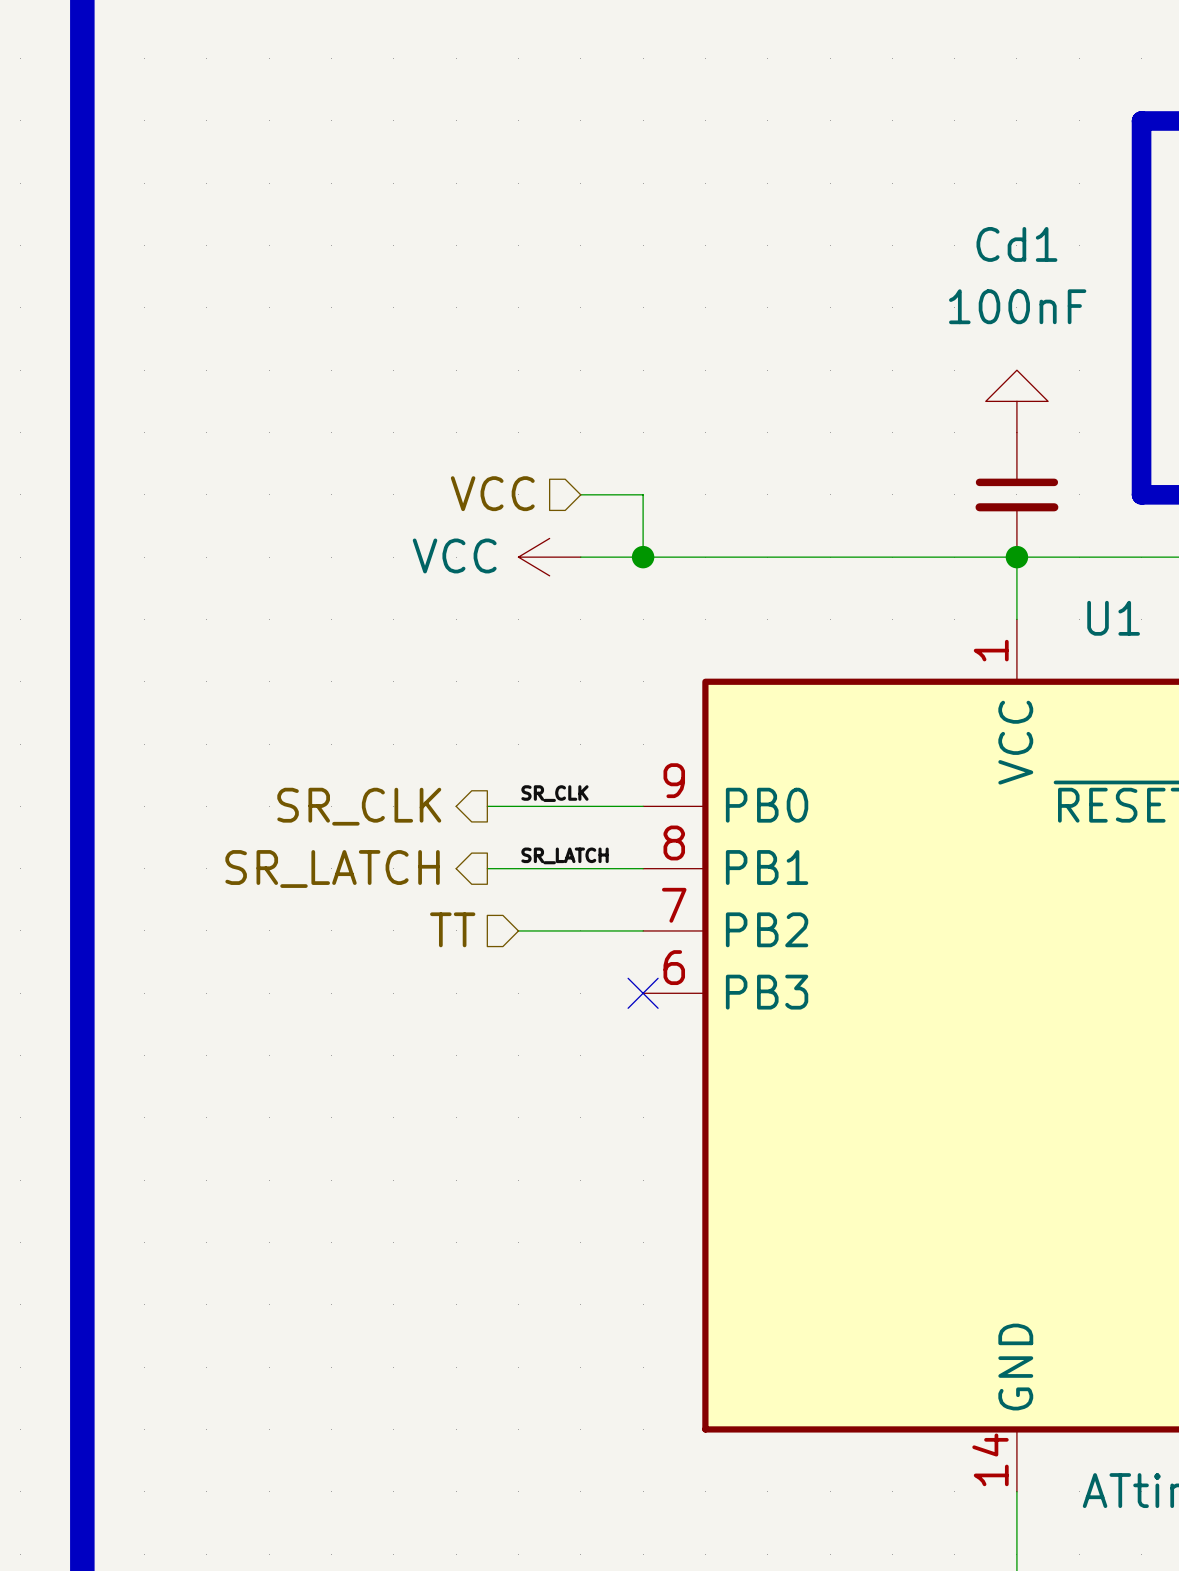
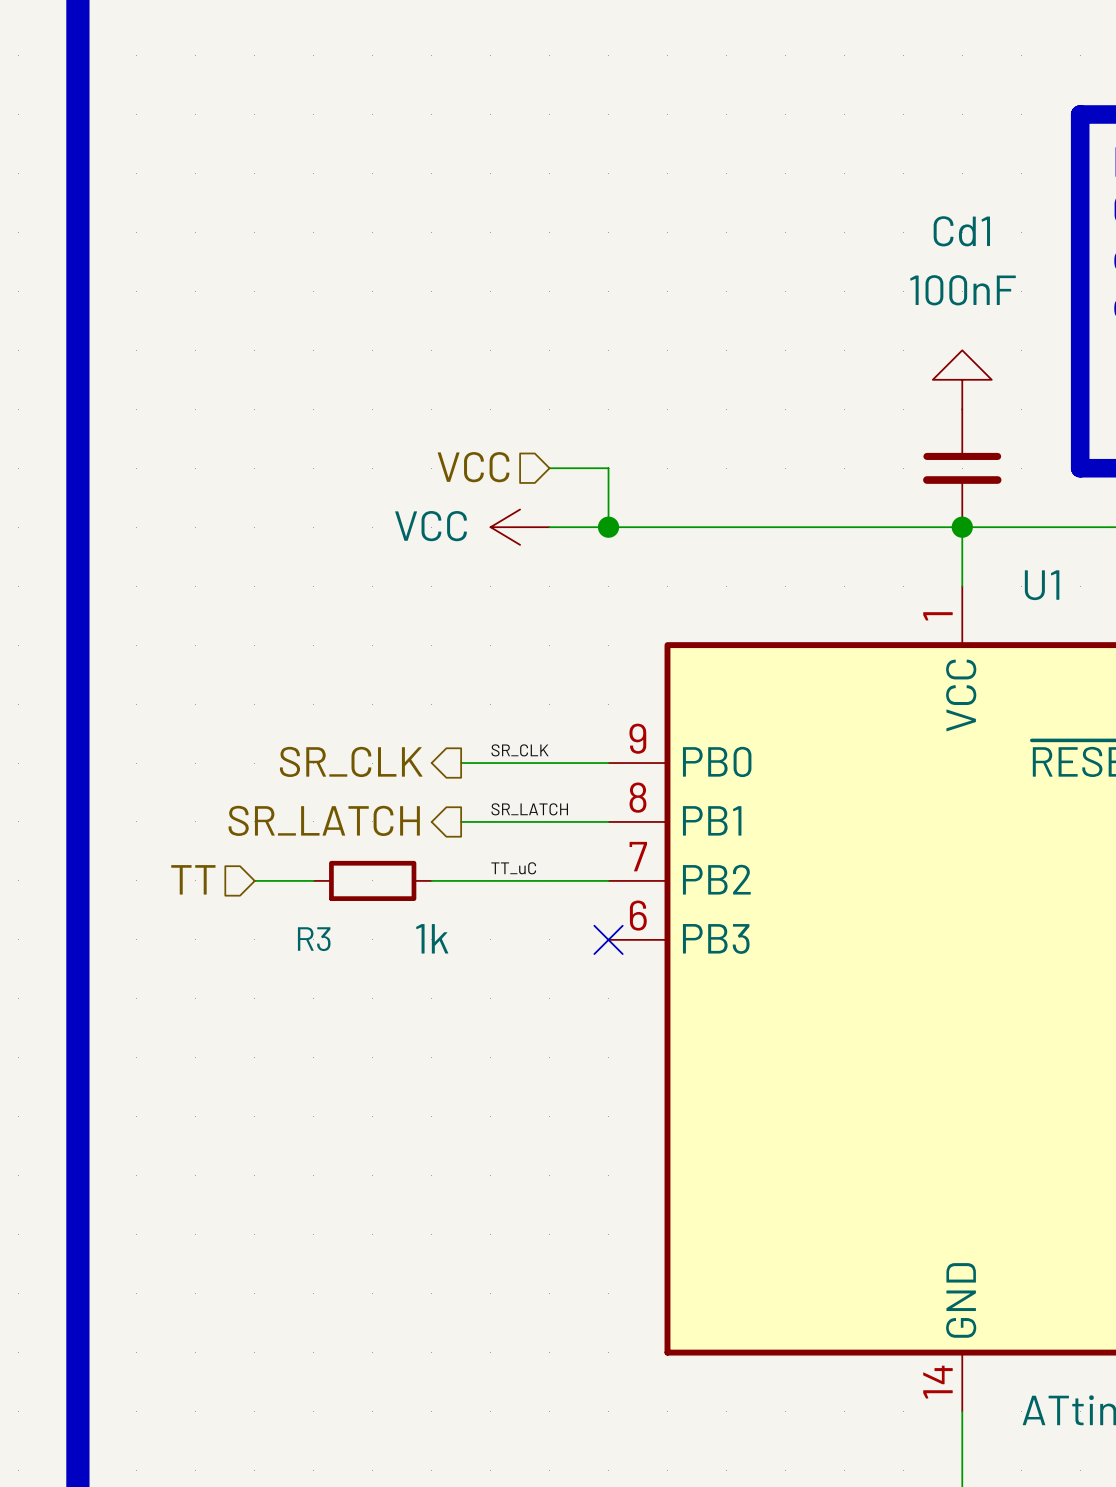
label: none -> TT_uC (513, 868)
hierarchical label position: TT (452, 929) -> TT (193, 879)
wire: none -> (254, 880) (313, 880)
R3: none -> 1k (372, 880)
wire: none -> (431, 880) (490, 880)

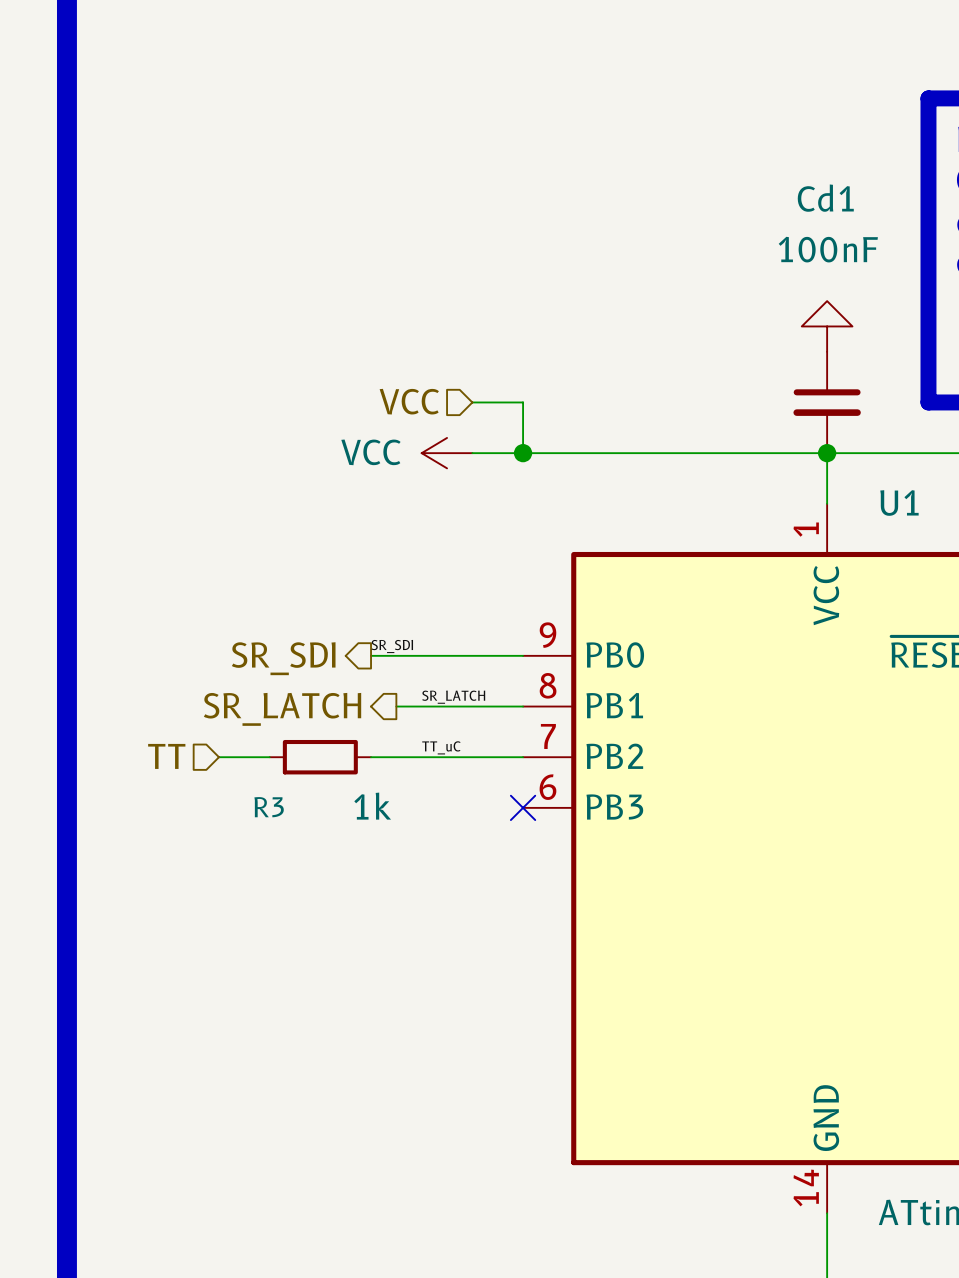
label: none -> SR_SDI (392, 646)
label: SR_CLK (520, 750) -> none
hierarchical label: none -> SR_SDI (283, 658)
hierarchical label: SR_CLK (351, 761) -> none
wire: none -> (371, 655) (396, 655)

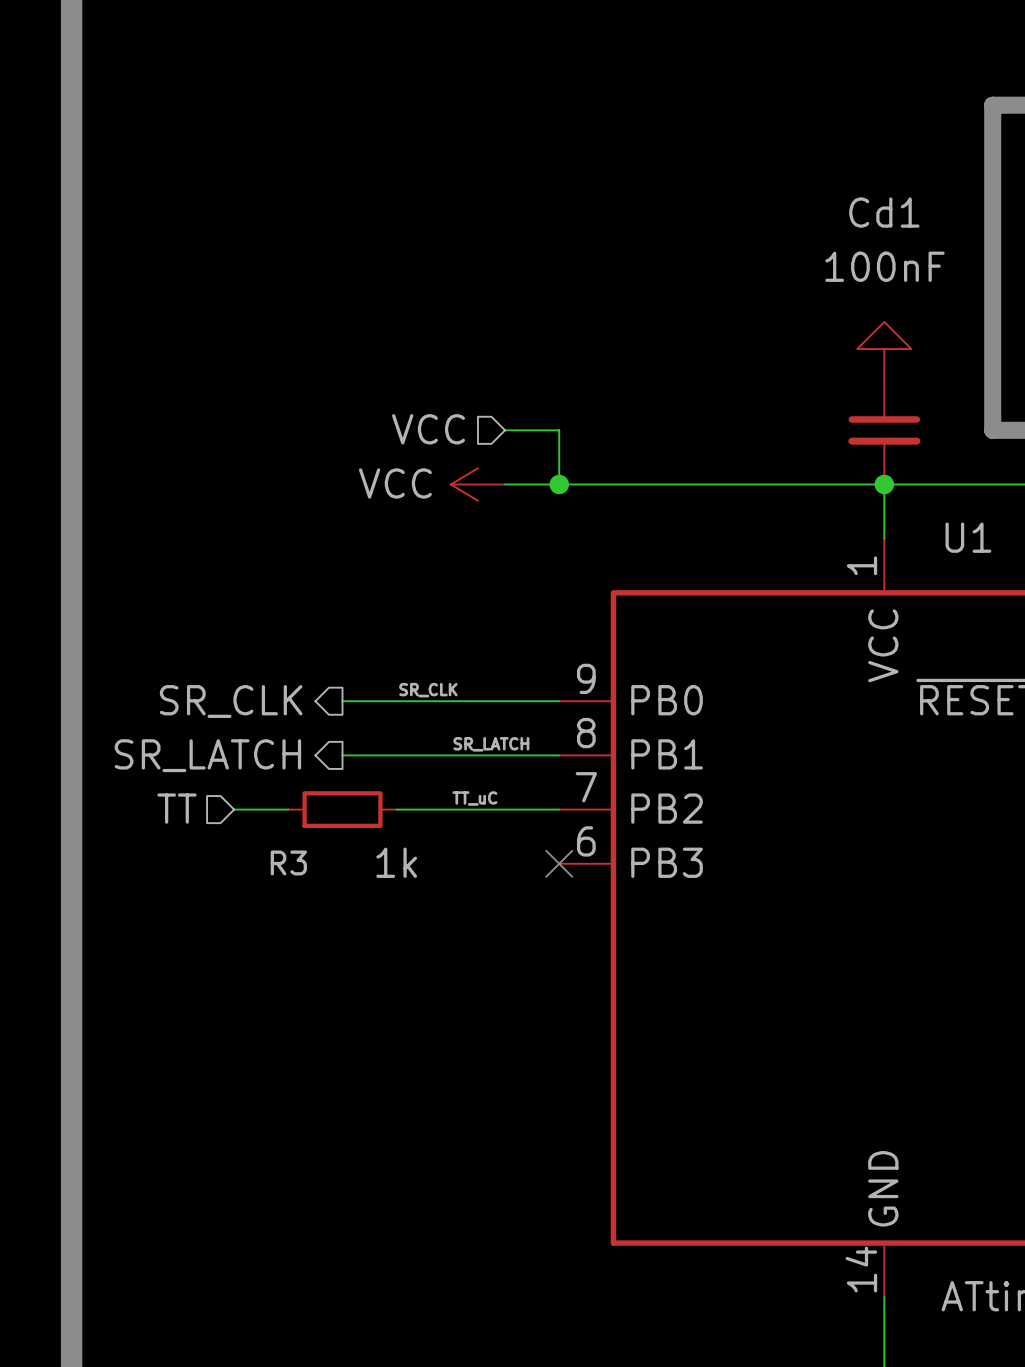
label: SR_SDI (392, 646) -> SR_CLK (428, 690)
wire: none -> (342, 701) (396, 701)
hierarchical label: none -> SR_CLK (231, 701)
hierarchical label: SR_SDI (283, 658) -> none
wire: none -> (342, 755) (423, 755)
hierarchical label position: SR_LATCH (282, 709) -> SR_LATCH (207, 755)

